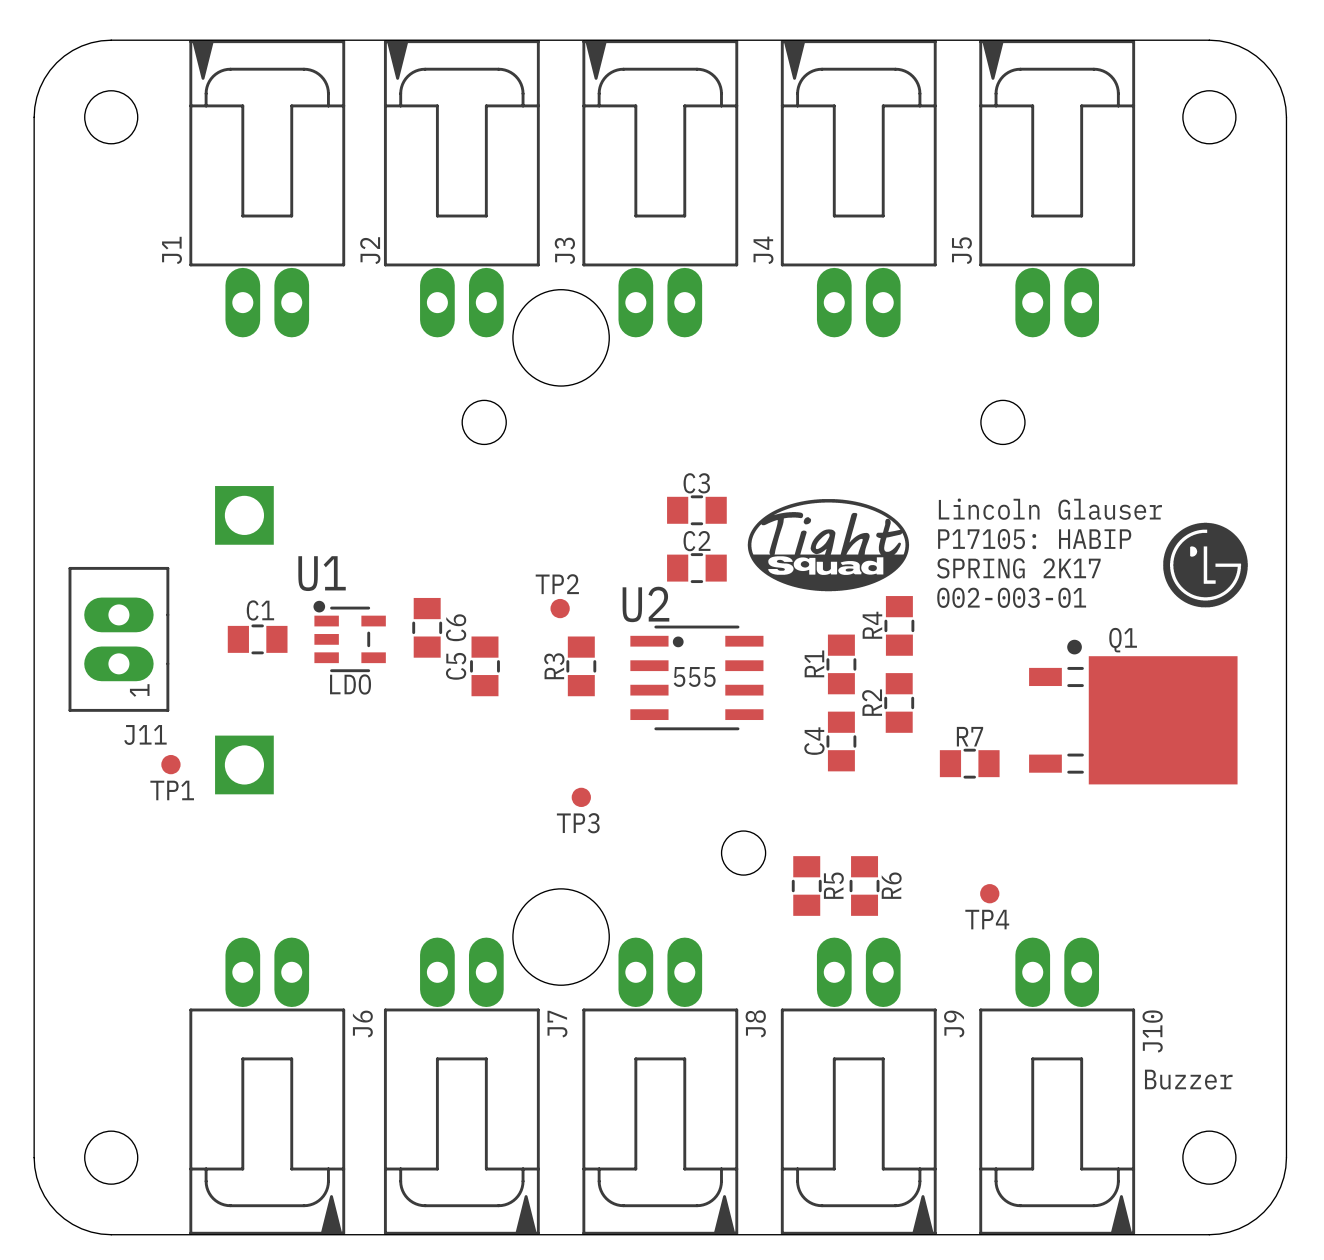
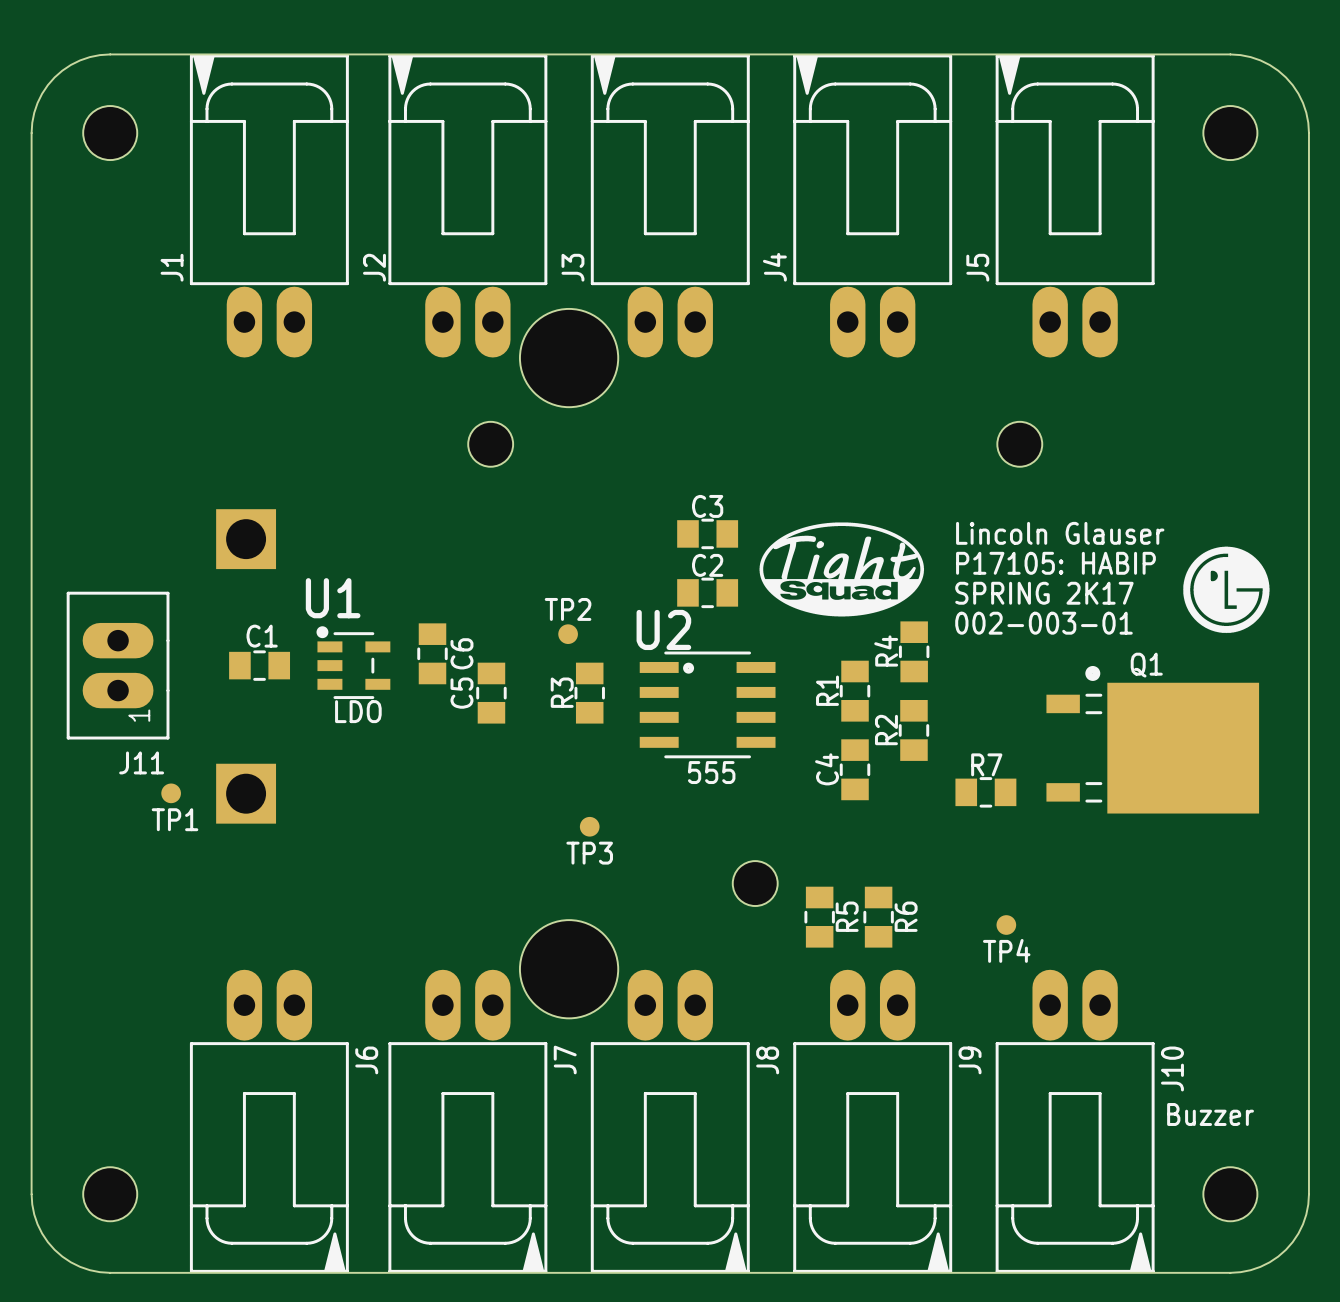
text position: 555 (694, 676) -> 555 (711, 772)

